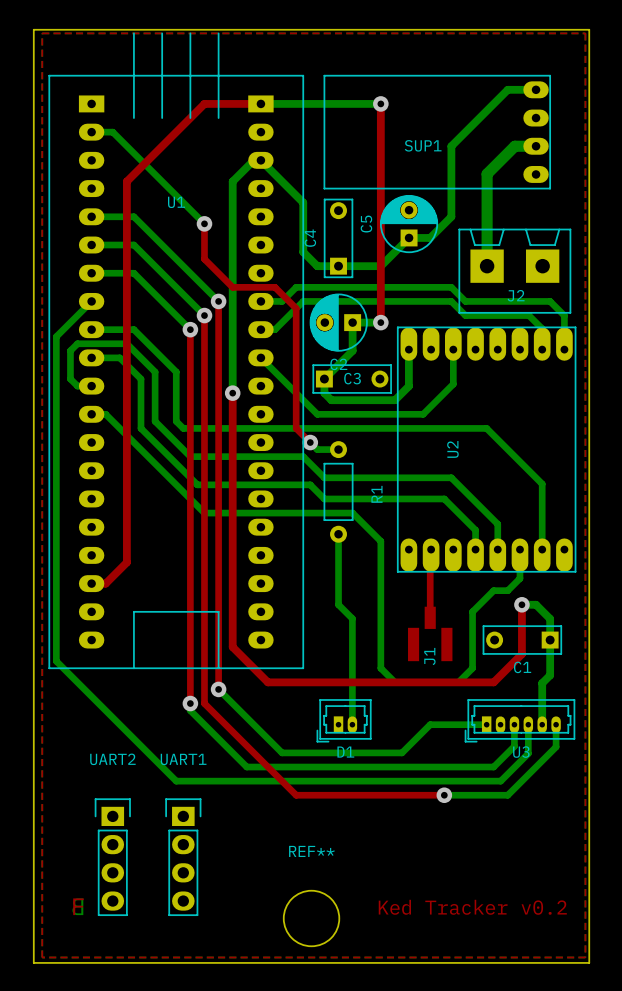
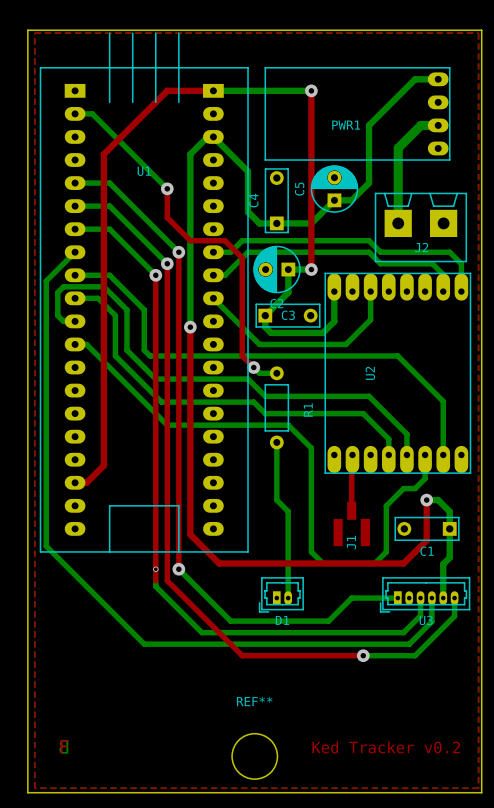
SUP1 name: SUP1 (423, 145) -> PWR1 (346, 125)
via: none -> (155, 569)
via: (190, 703) -> none
UART2: (112, 857) -> none
UART1: (183, 857) -> none

